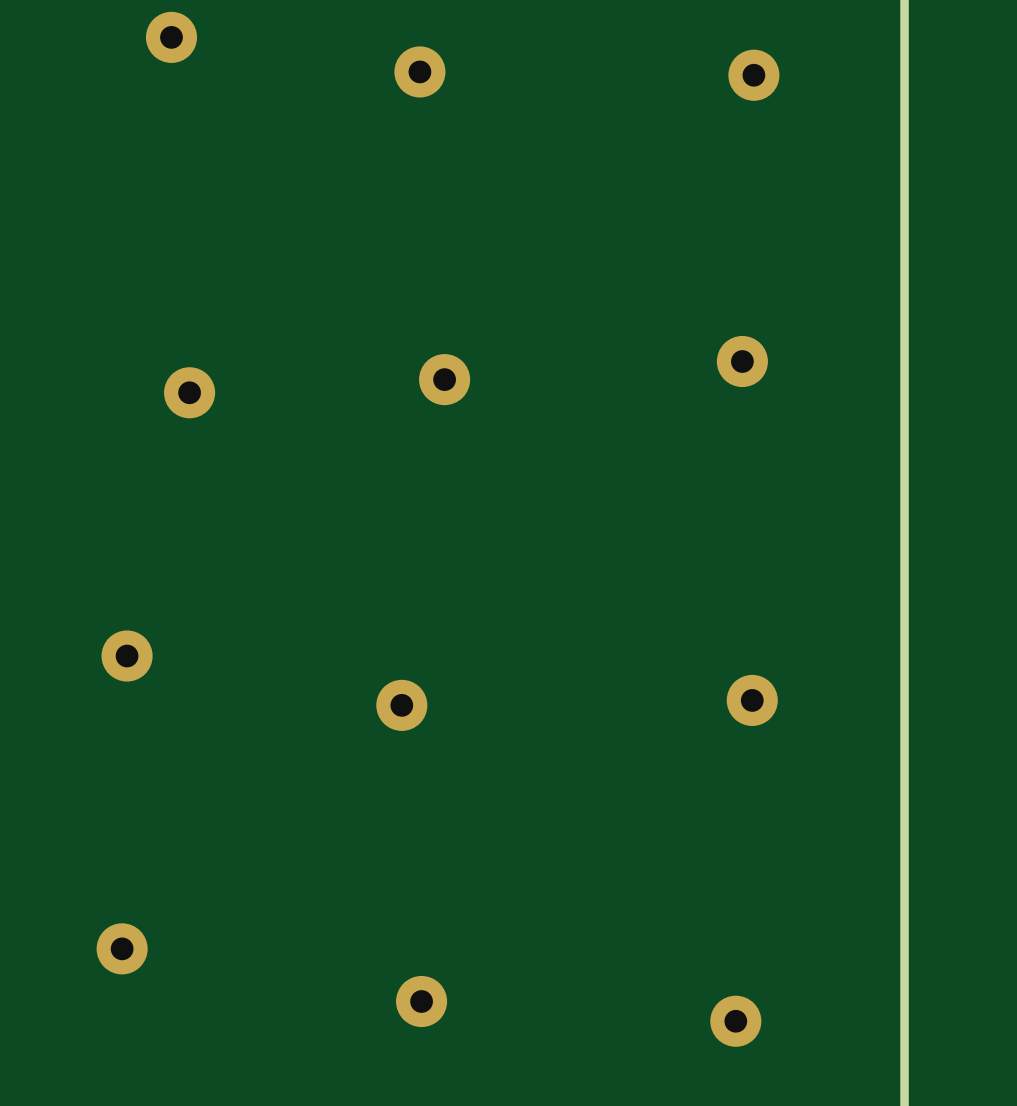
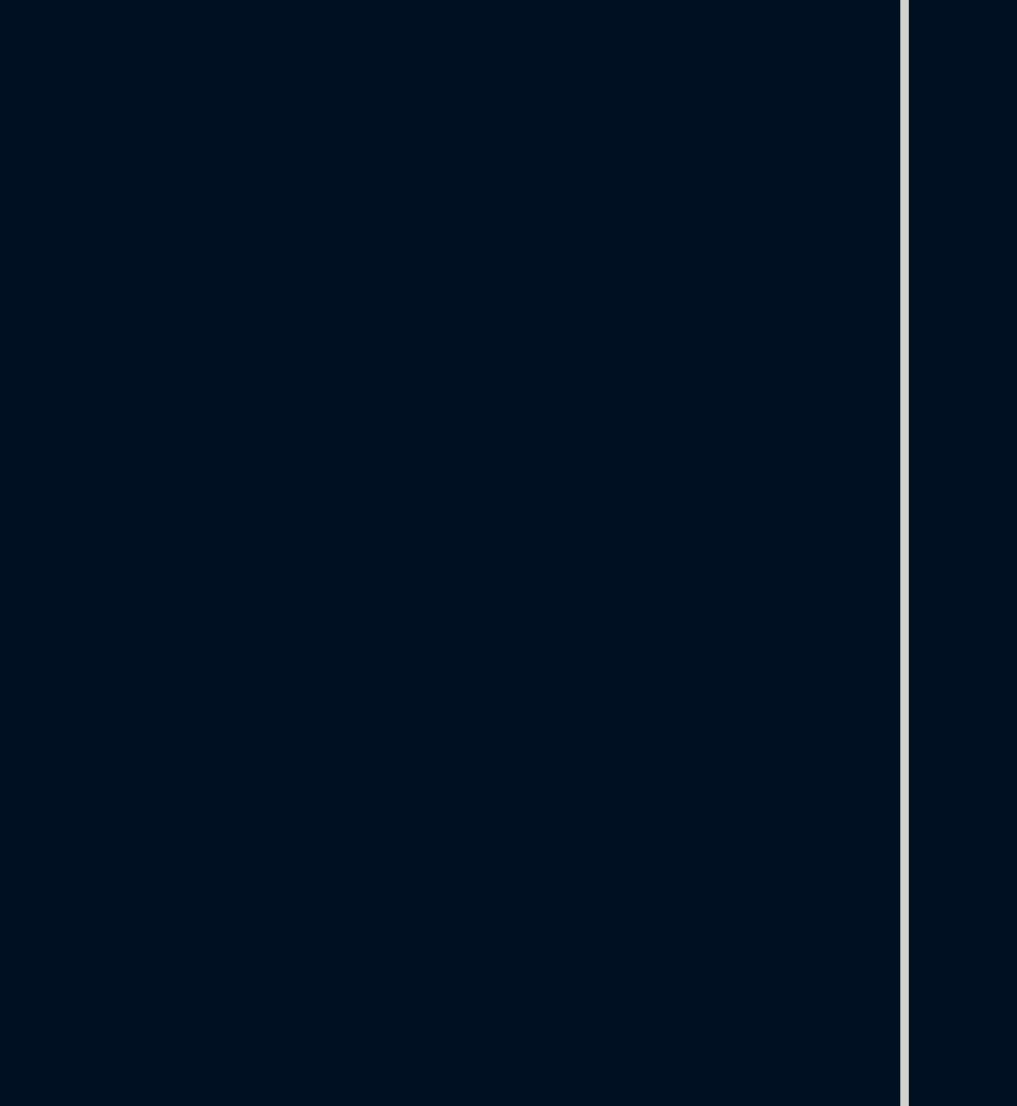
via: (171, 37) -> none
via: (419, 71) -> none
via: (753, 75) -> none
via: (742, 361) -> none
via: (444, 379) -> none
via: (189, 392) -> none
via: (127, 656) -> none
via: (752, 700) -> none
via: (401, 705) -> none
via: (122, 948) -> none
via: (421, 1001) -> none
via: (735, 1021) -> none

